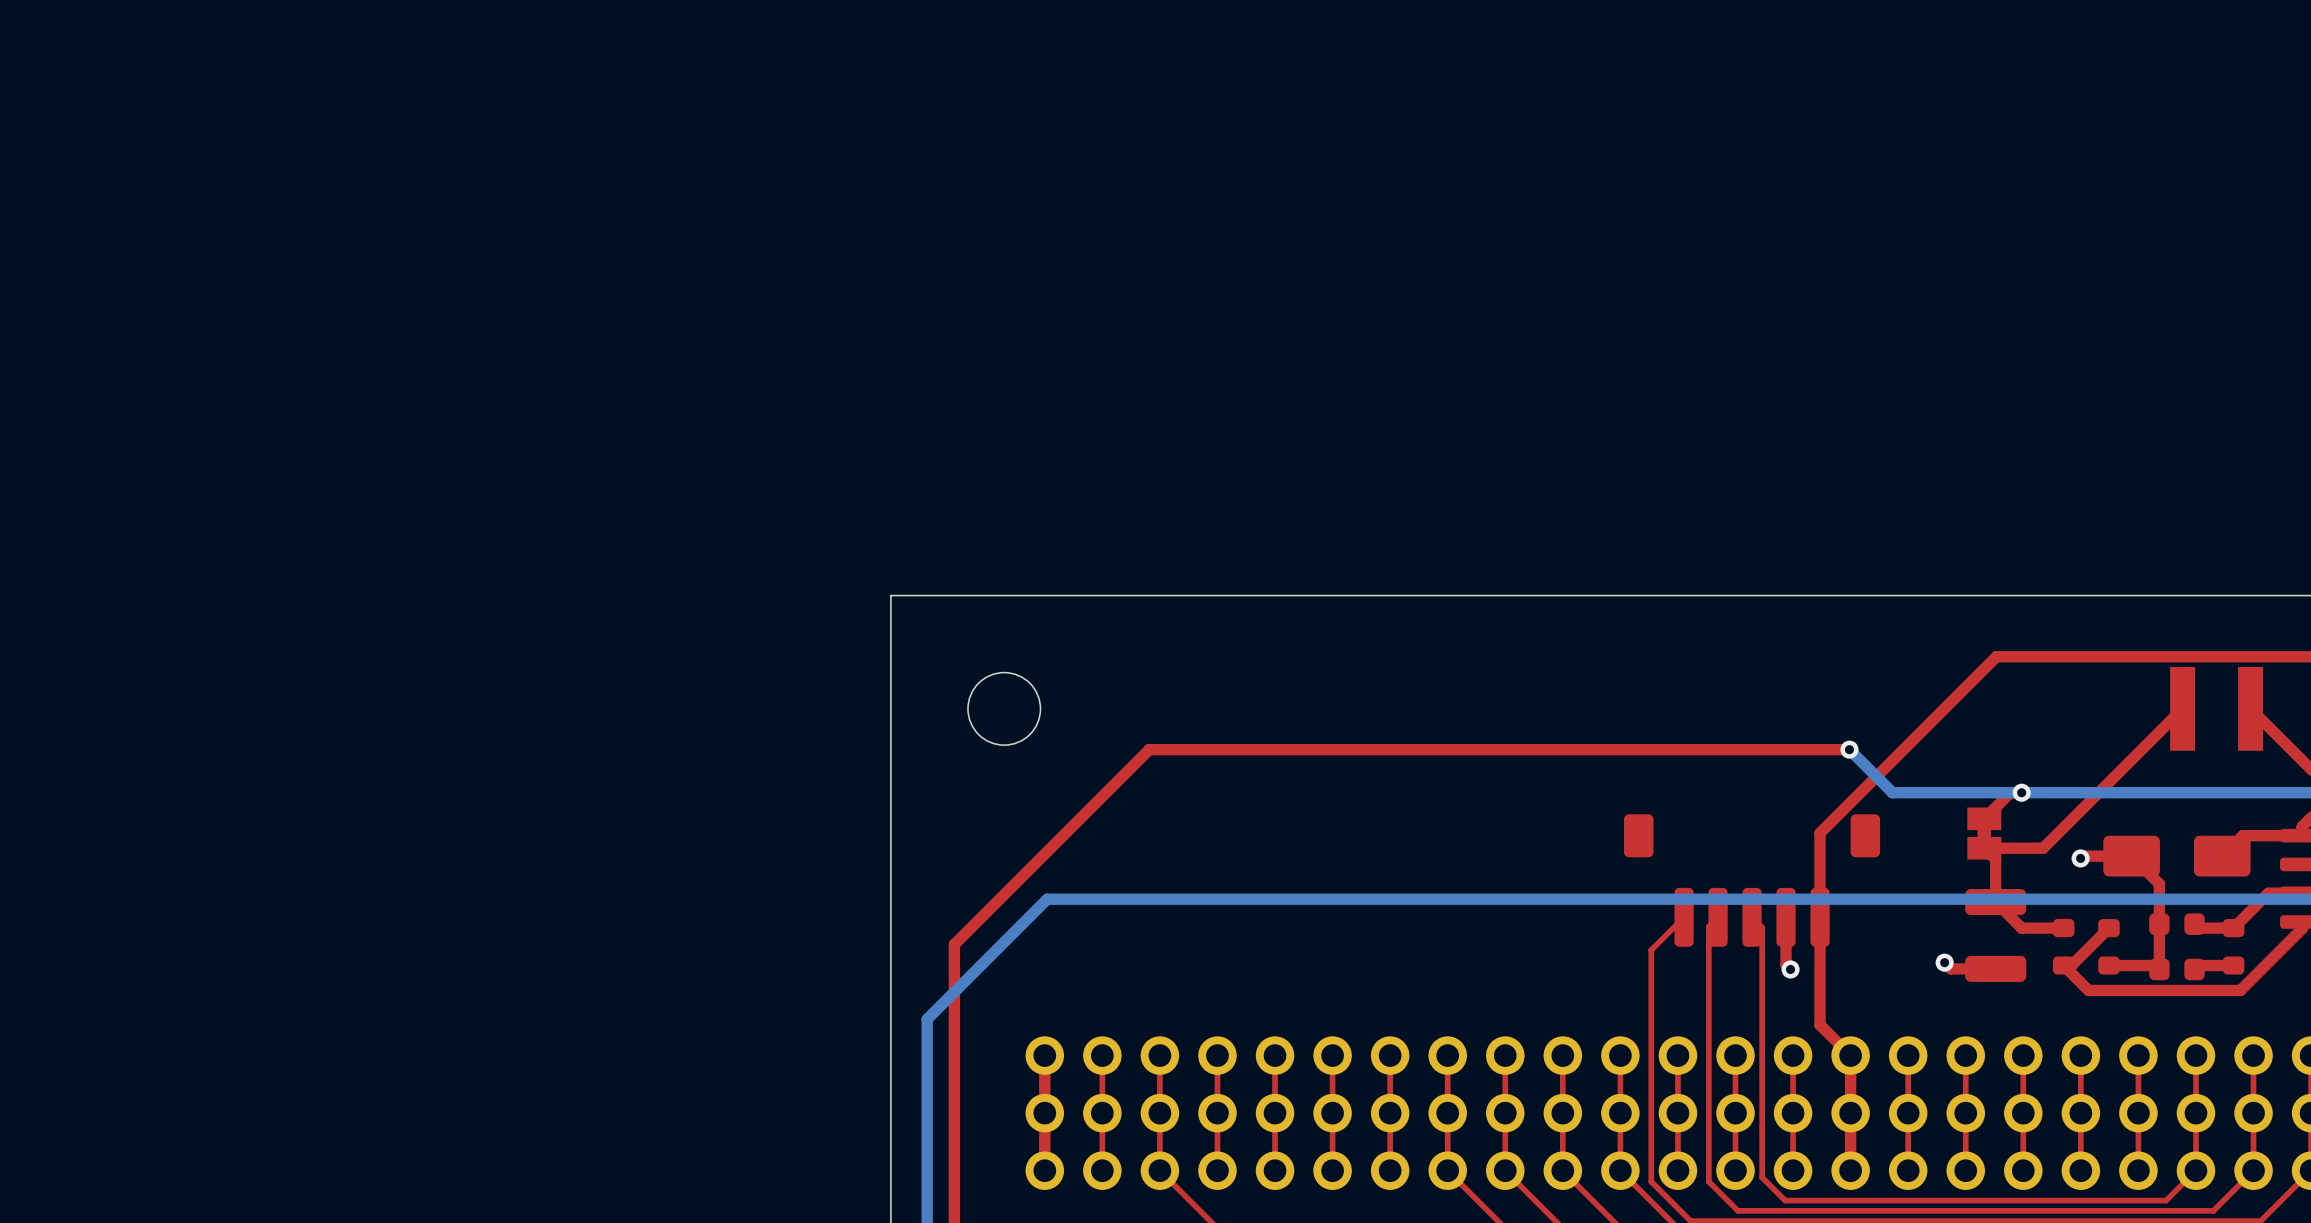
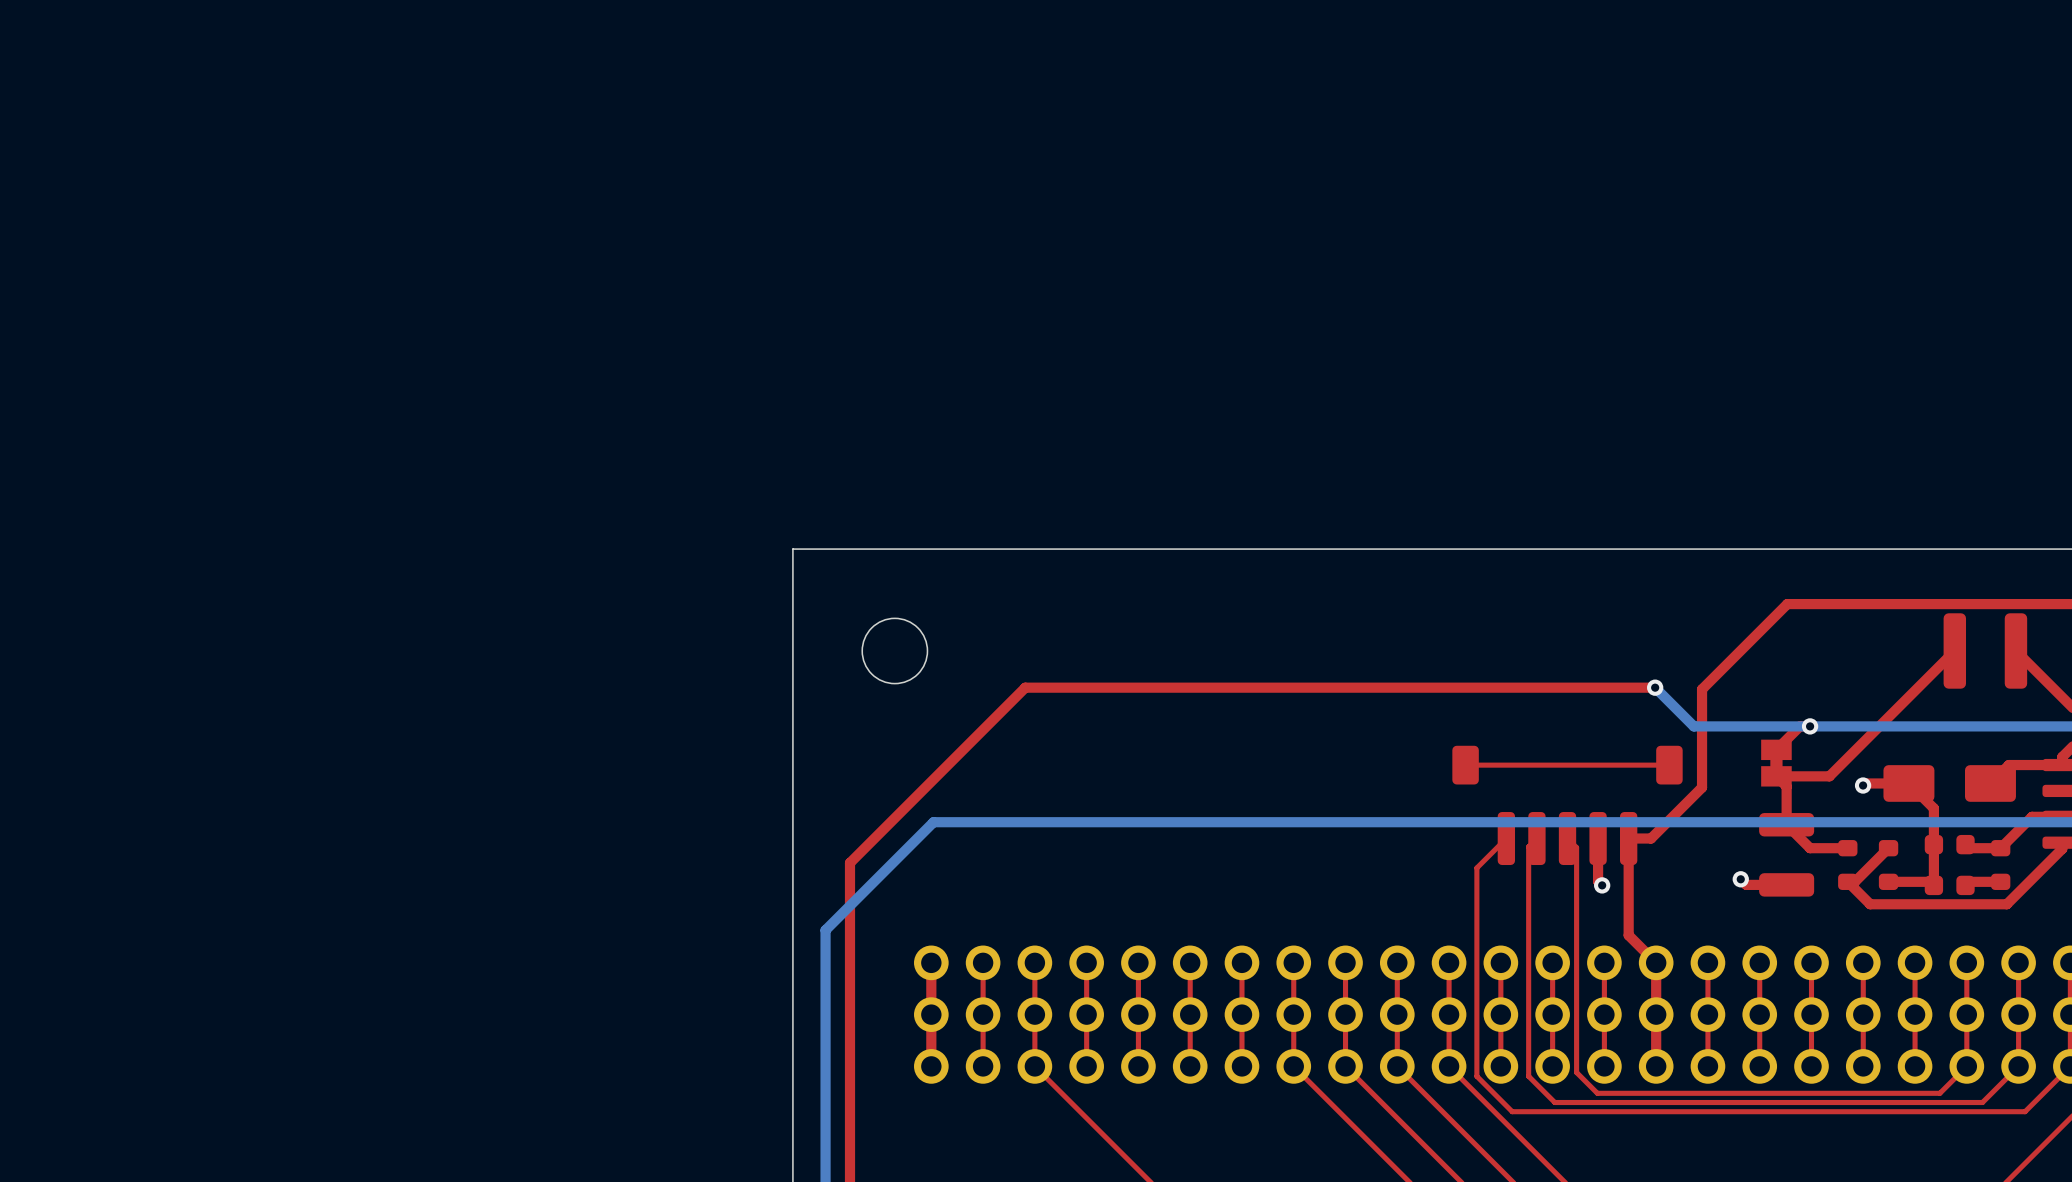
part footprint: [2170, 666, 2264, 751] -> [1943, 613, 2028, 689]
top track: (1901, 751) (1820, 833) (1820, 917) -> (1702, 689) (1702, 787) (1651, 838) (1628, 838)
top track: none -> (1669, 765) (1465, 765)

